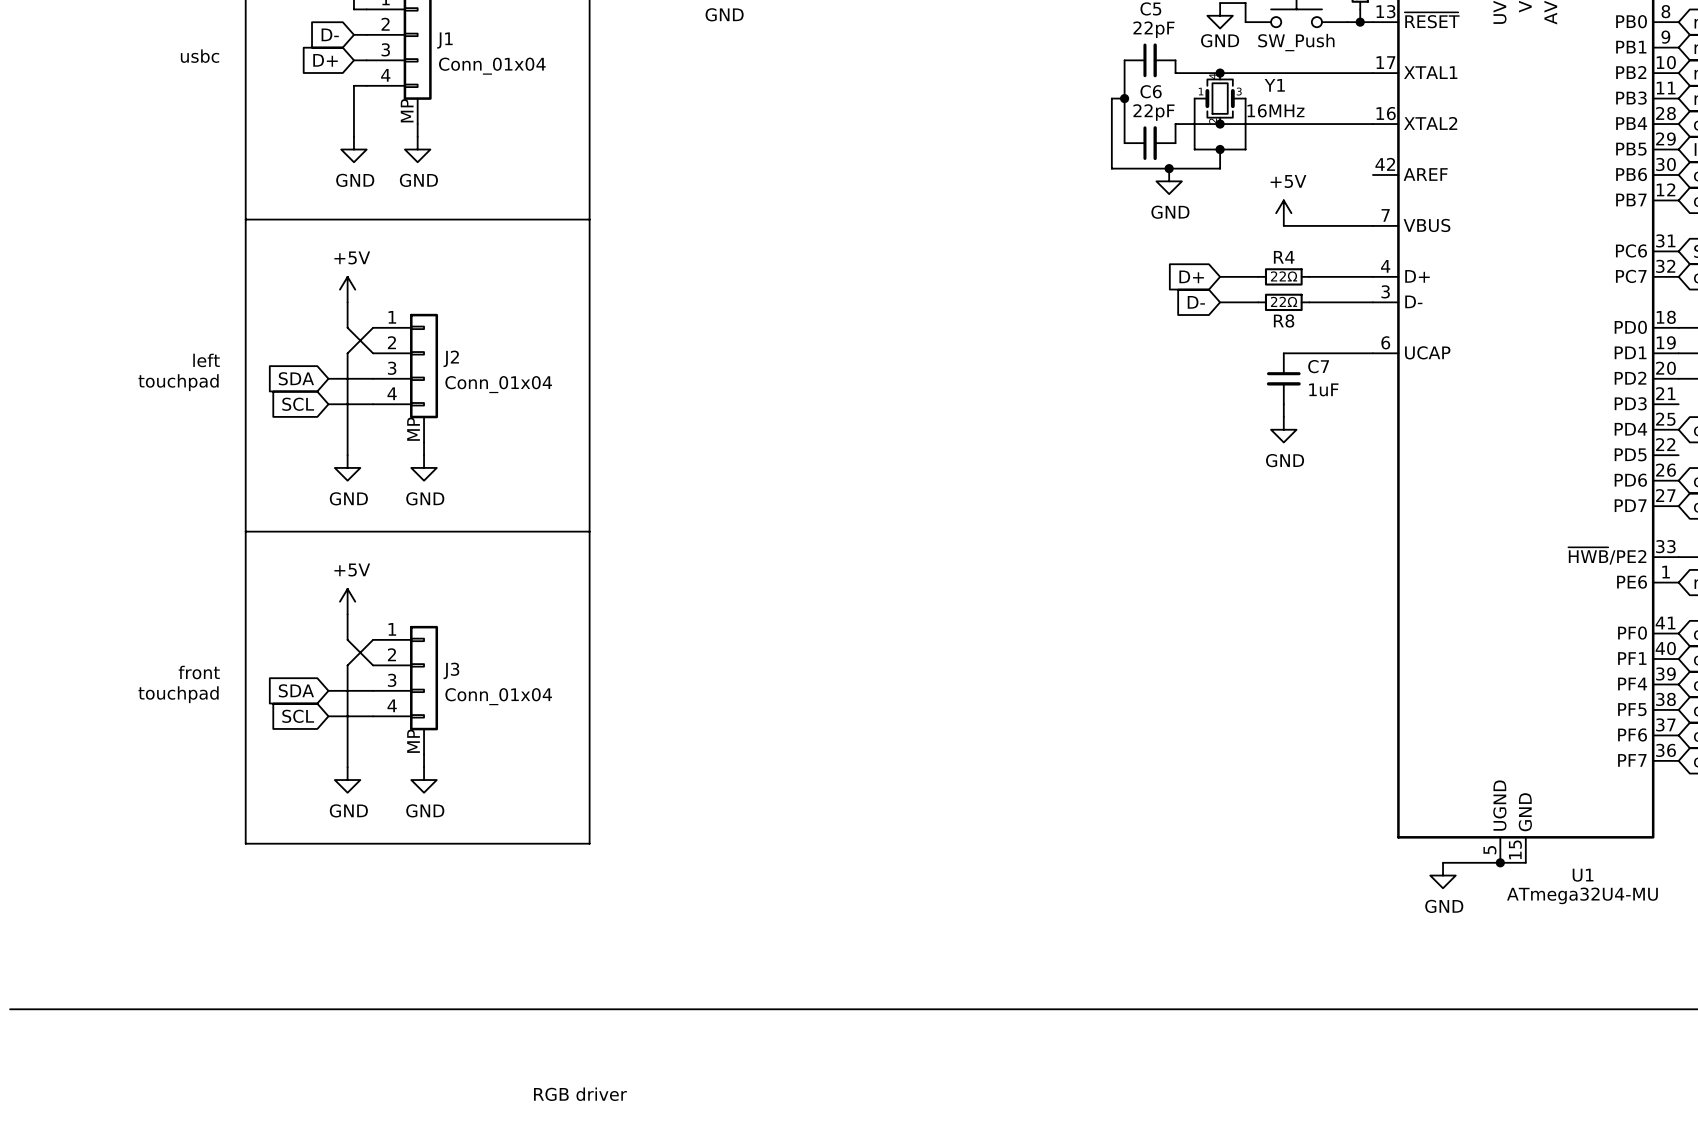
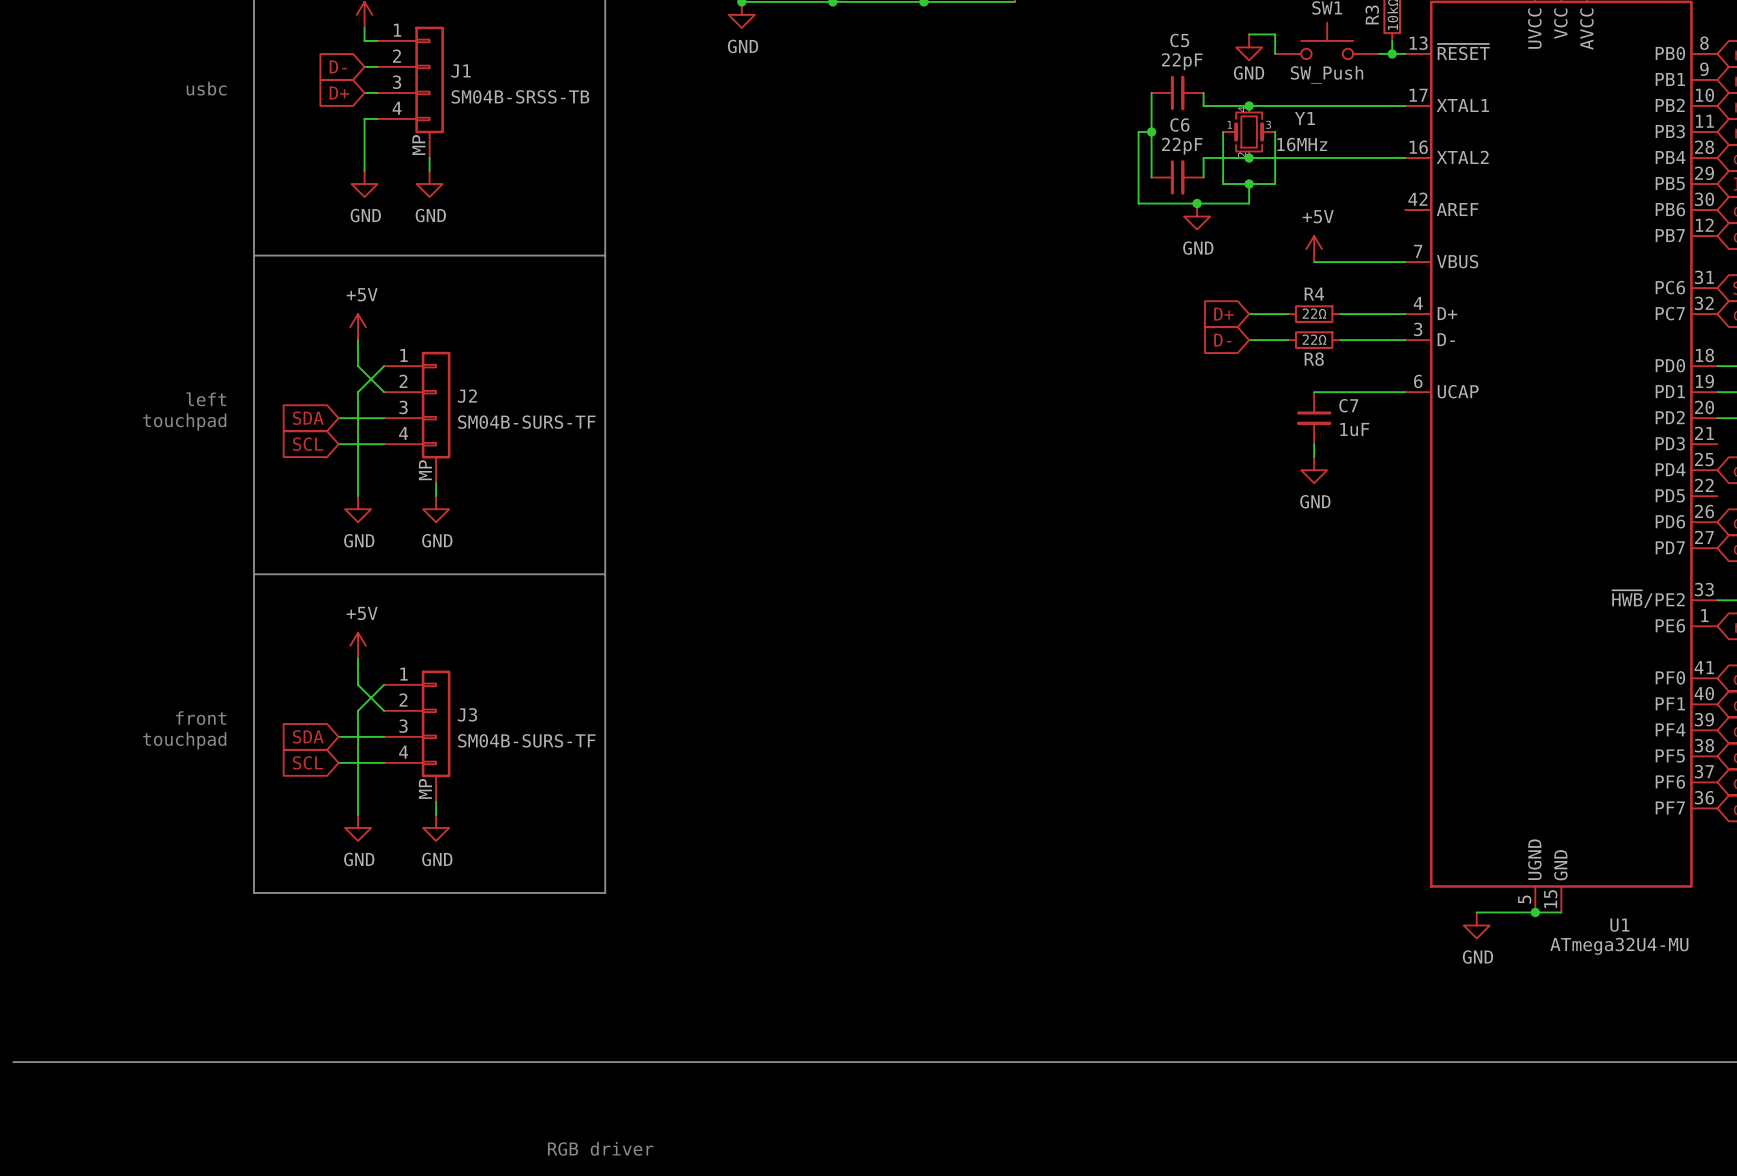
J1 value: Conn_01x04 (492, 66) -> SM04B-SRSS-TB (520, 96)
J2 value: Conn_01x04 (498, 384) -> SM04B-SURS-TF (526, 422)
J3 value: Conn_01x04 (498, 696) -> SM04B-SURS-TF (526, 740)

